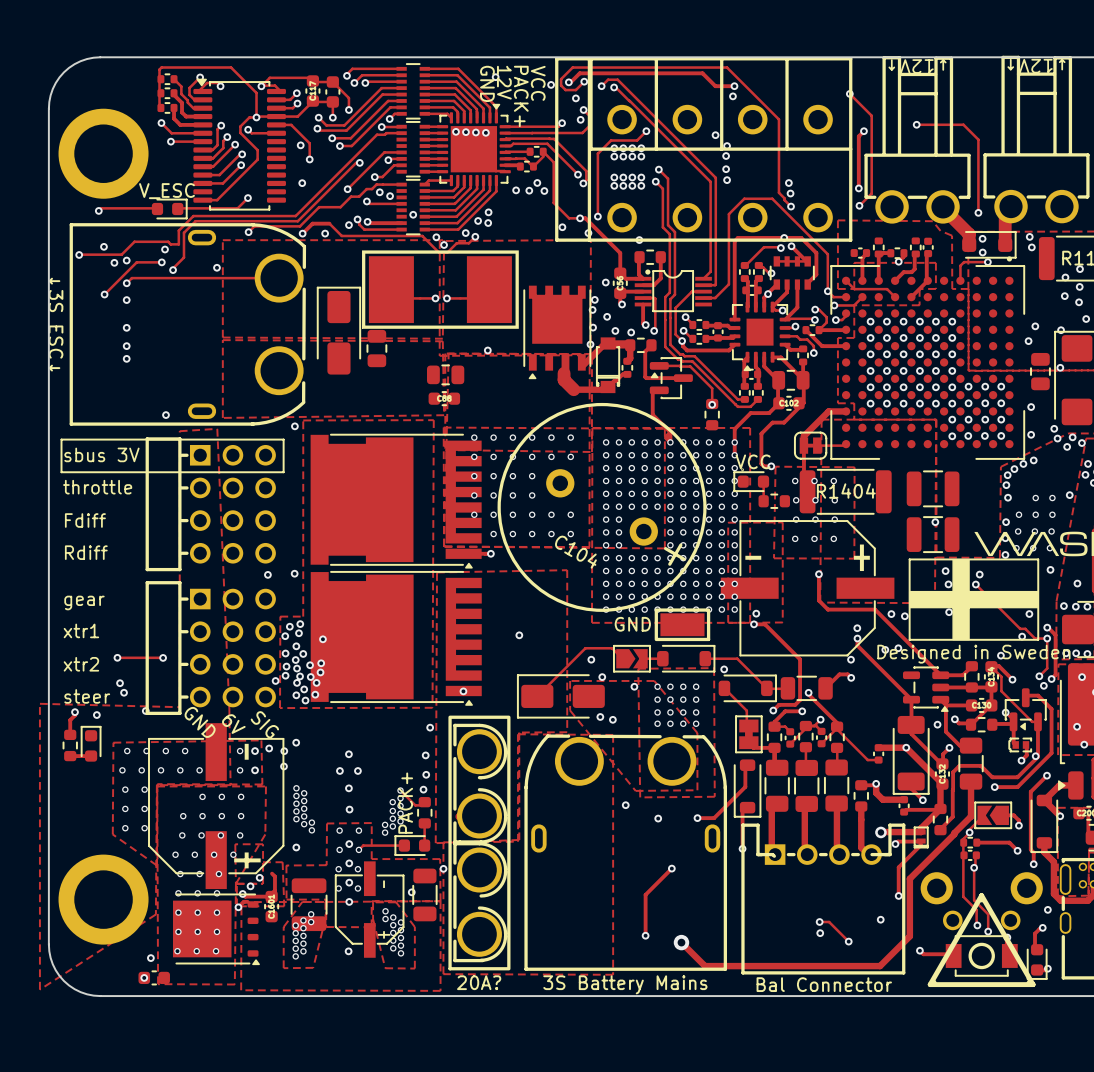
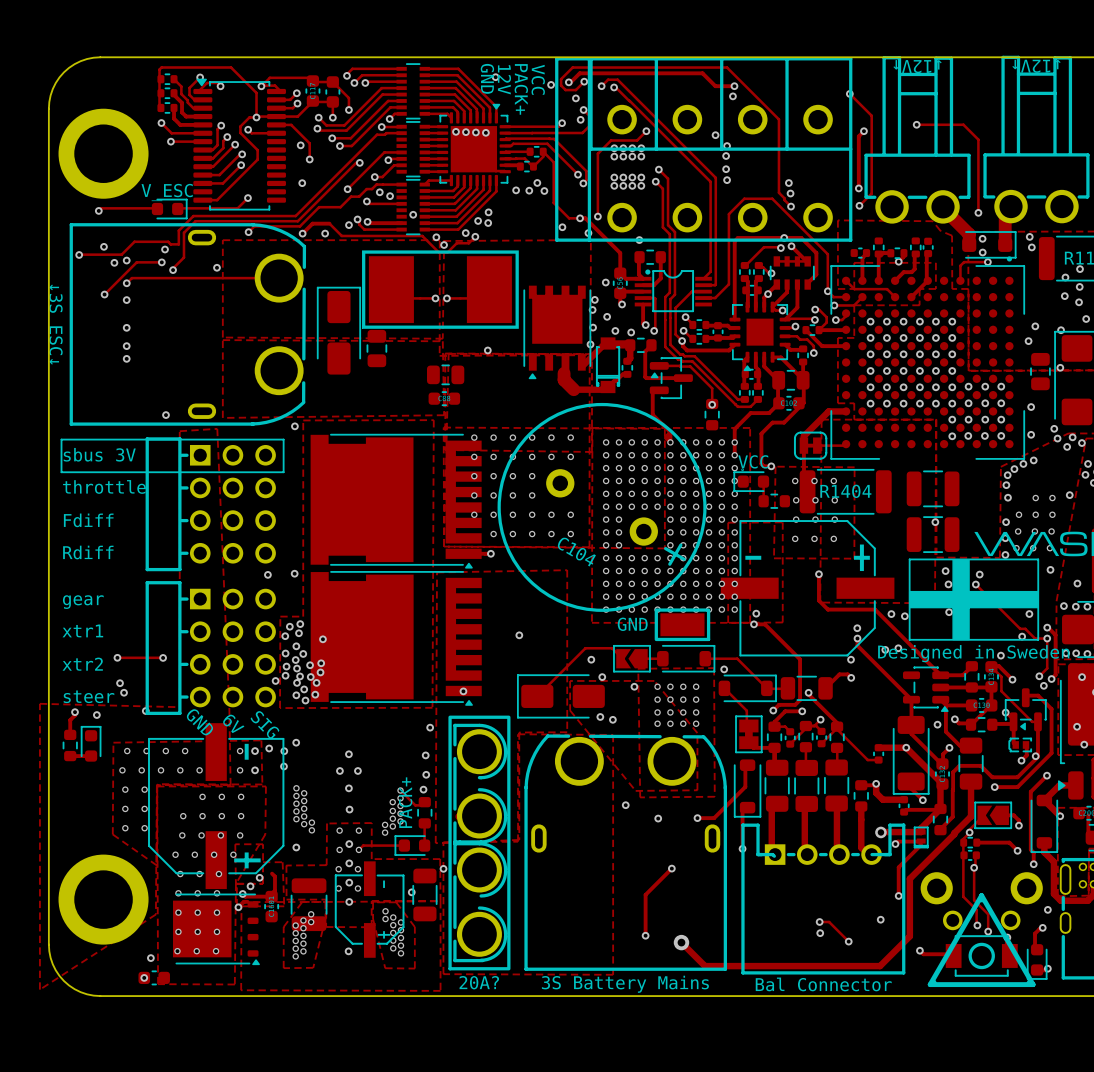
part rotation: 0° (631, 658) -> 180° (631, 658)

